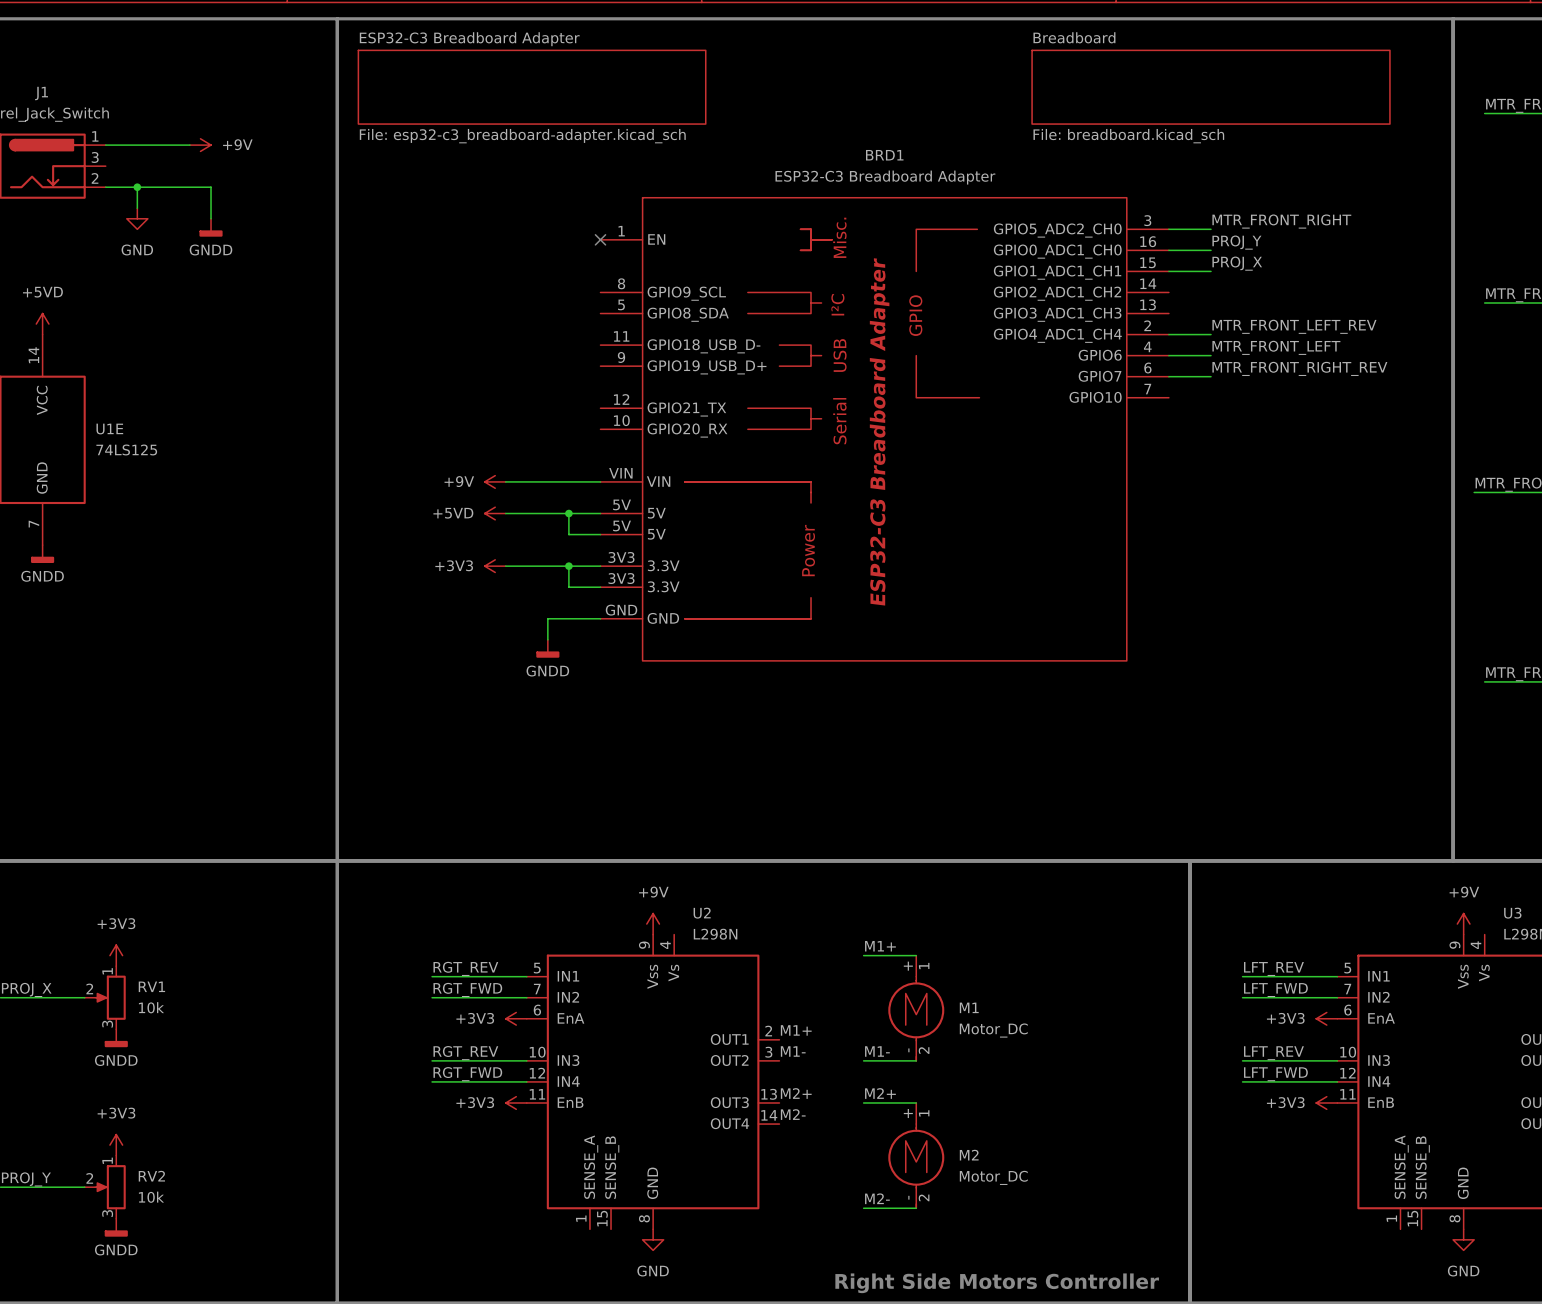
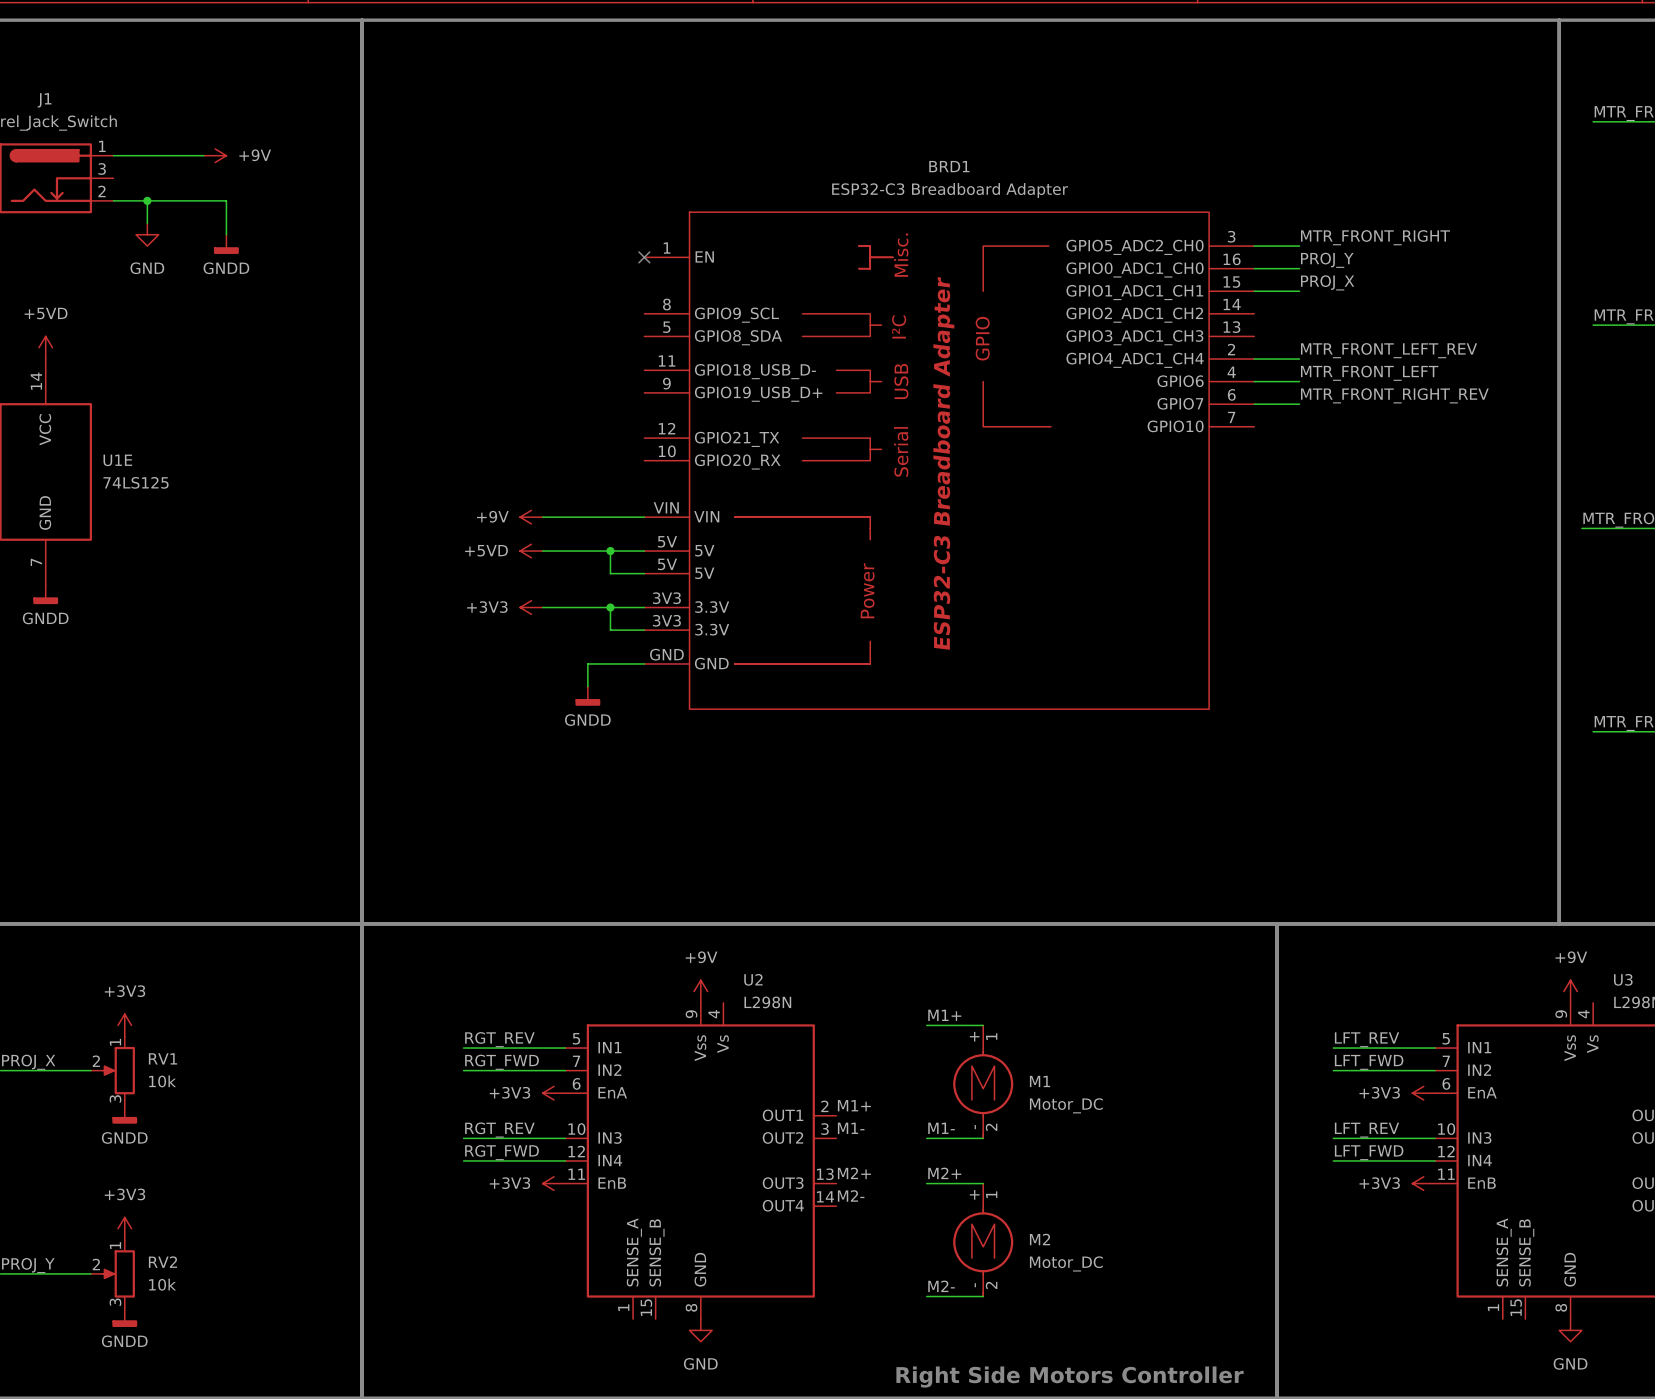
sheet ESP32-C3 Breadboard Adapter: File: esp32-c3_breadboard-adapter.kicad_sch (532, 87) -> none
sheet Breadboard: File: breadboard.kicad_sch (1211, 87) -> none

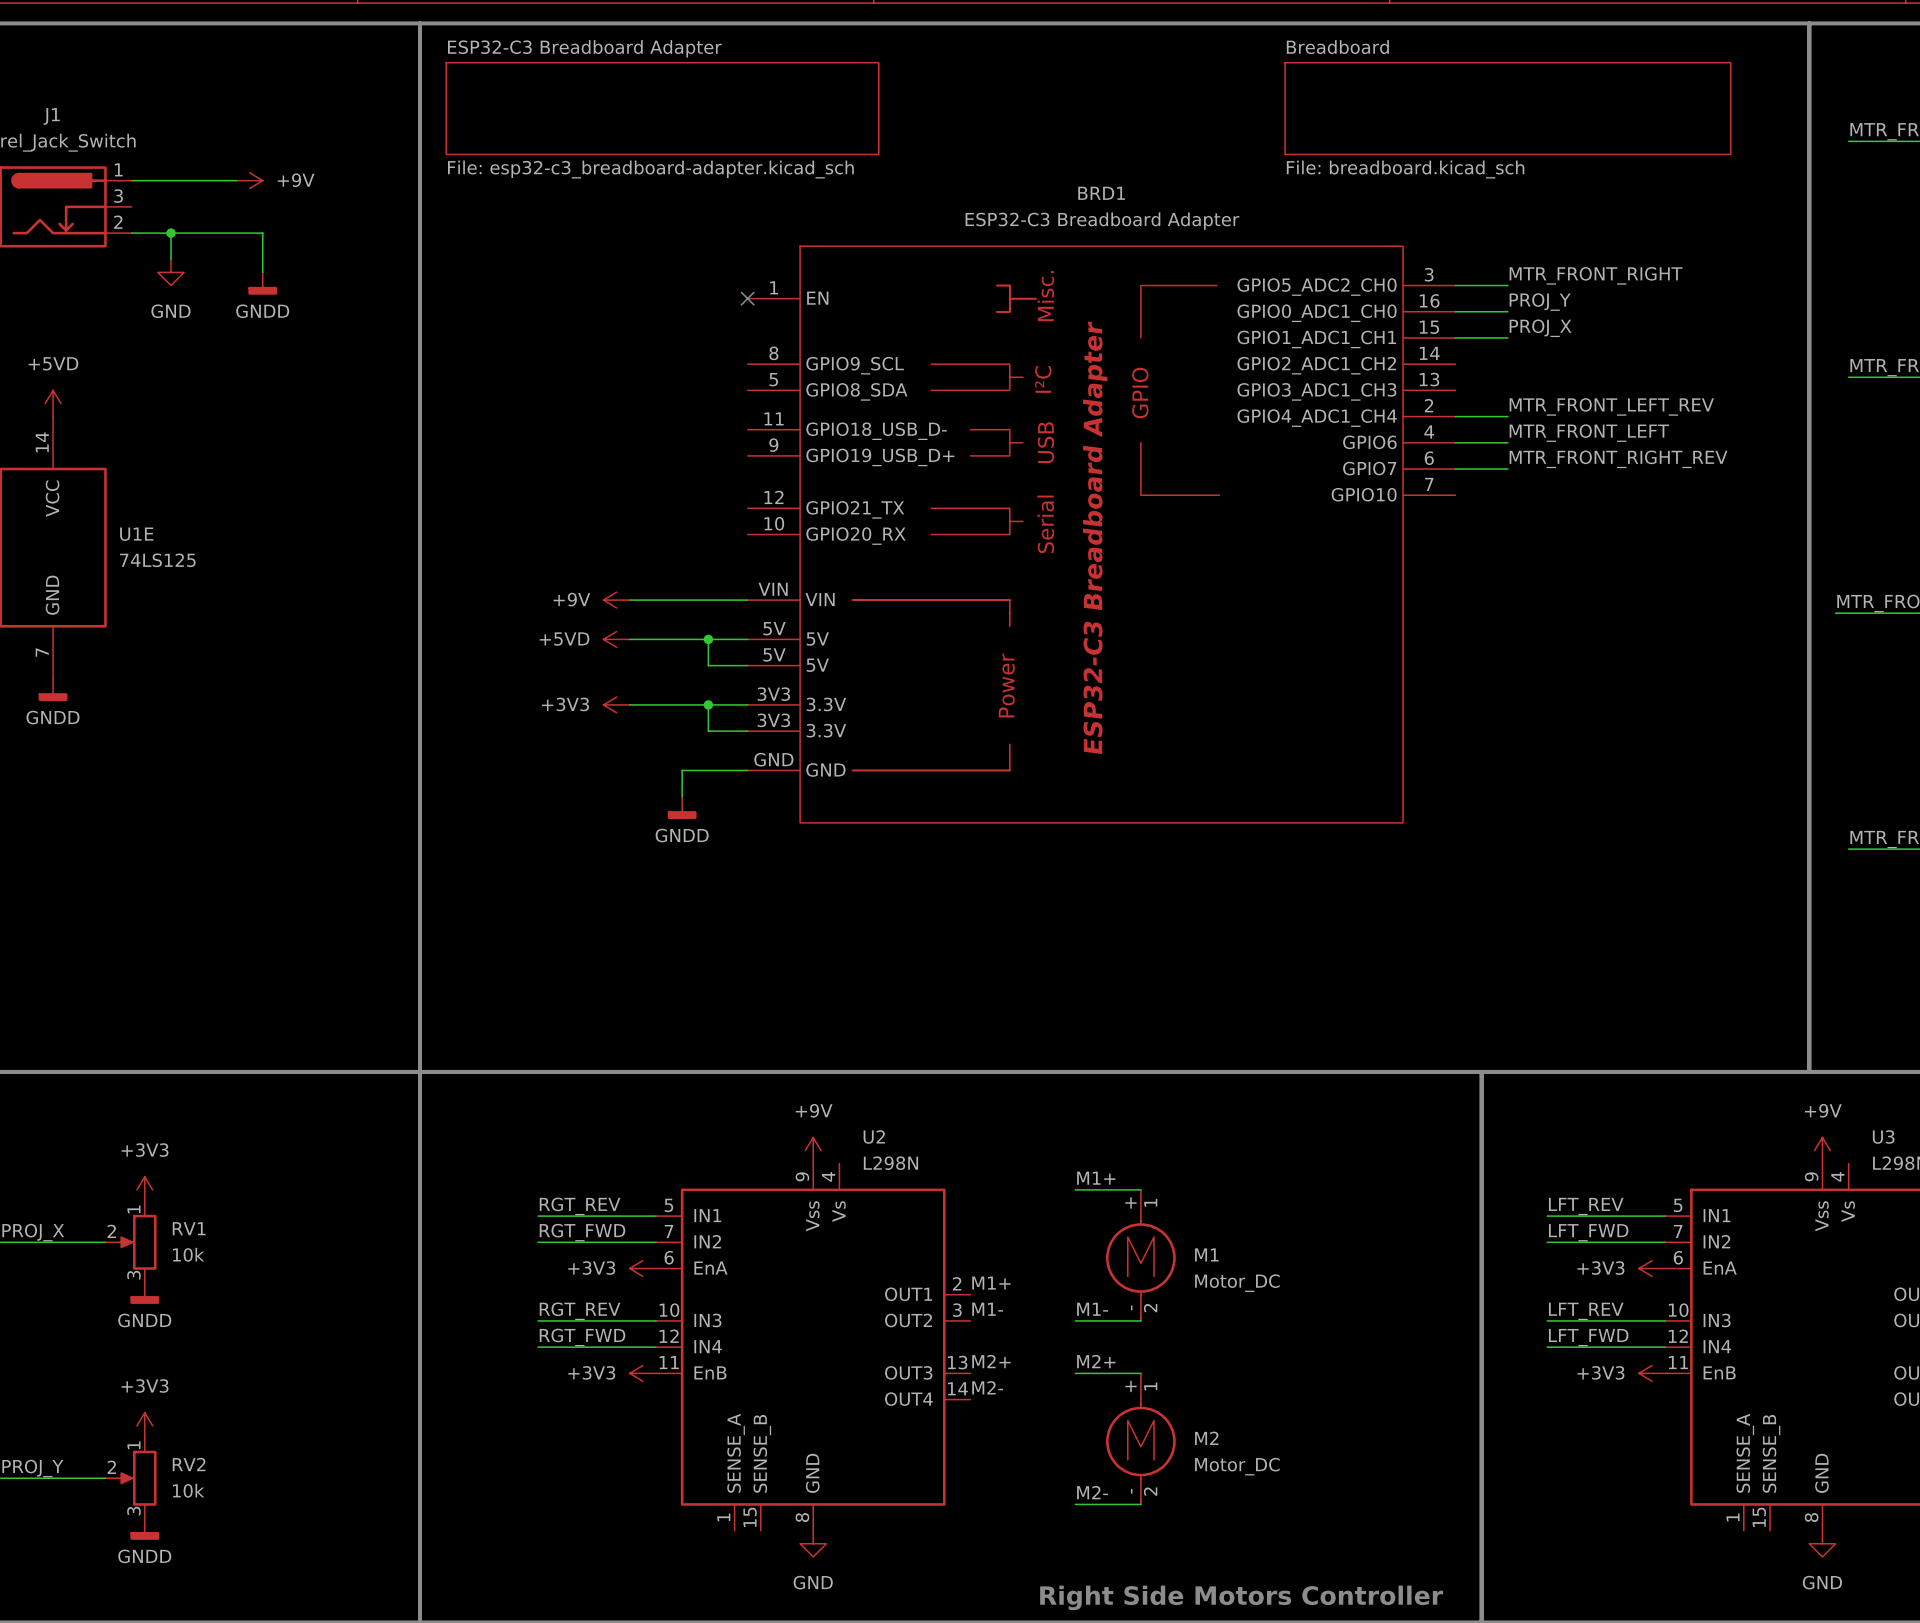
sheet ESP32-C3 Breadboard Adapter: none -> File: esp32-c3_breadboard-adapter.kicad_sch (662, 108)
sheet Breadboard: none -> File: breadboard.kicad_sch (1507, 108)

